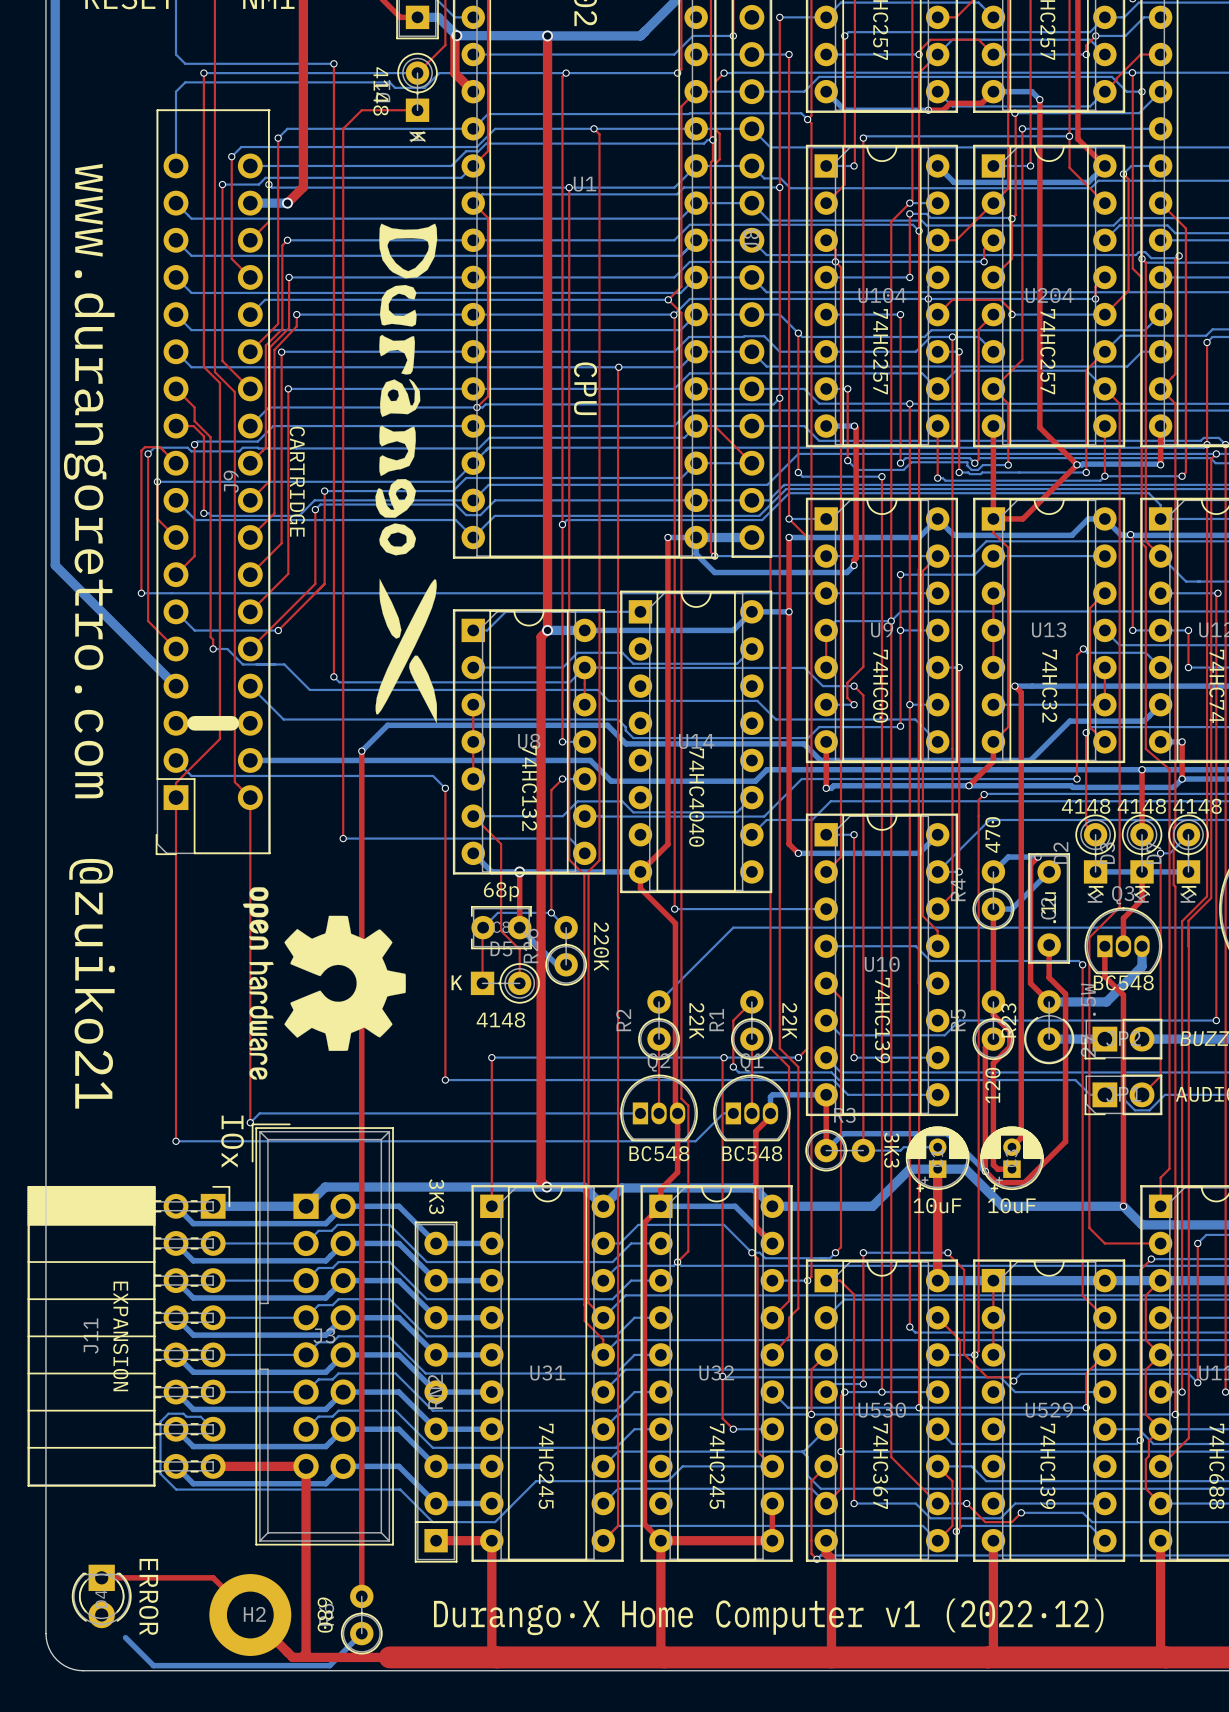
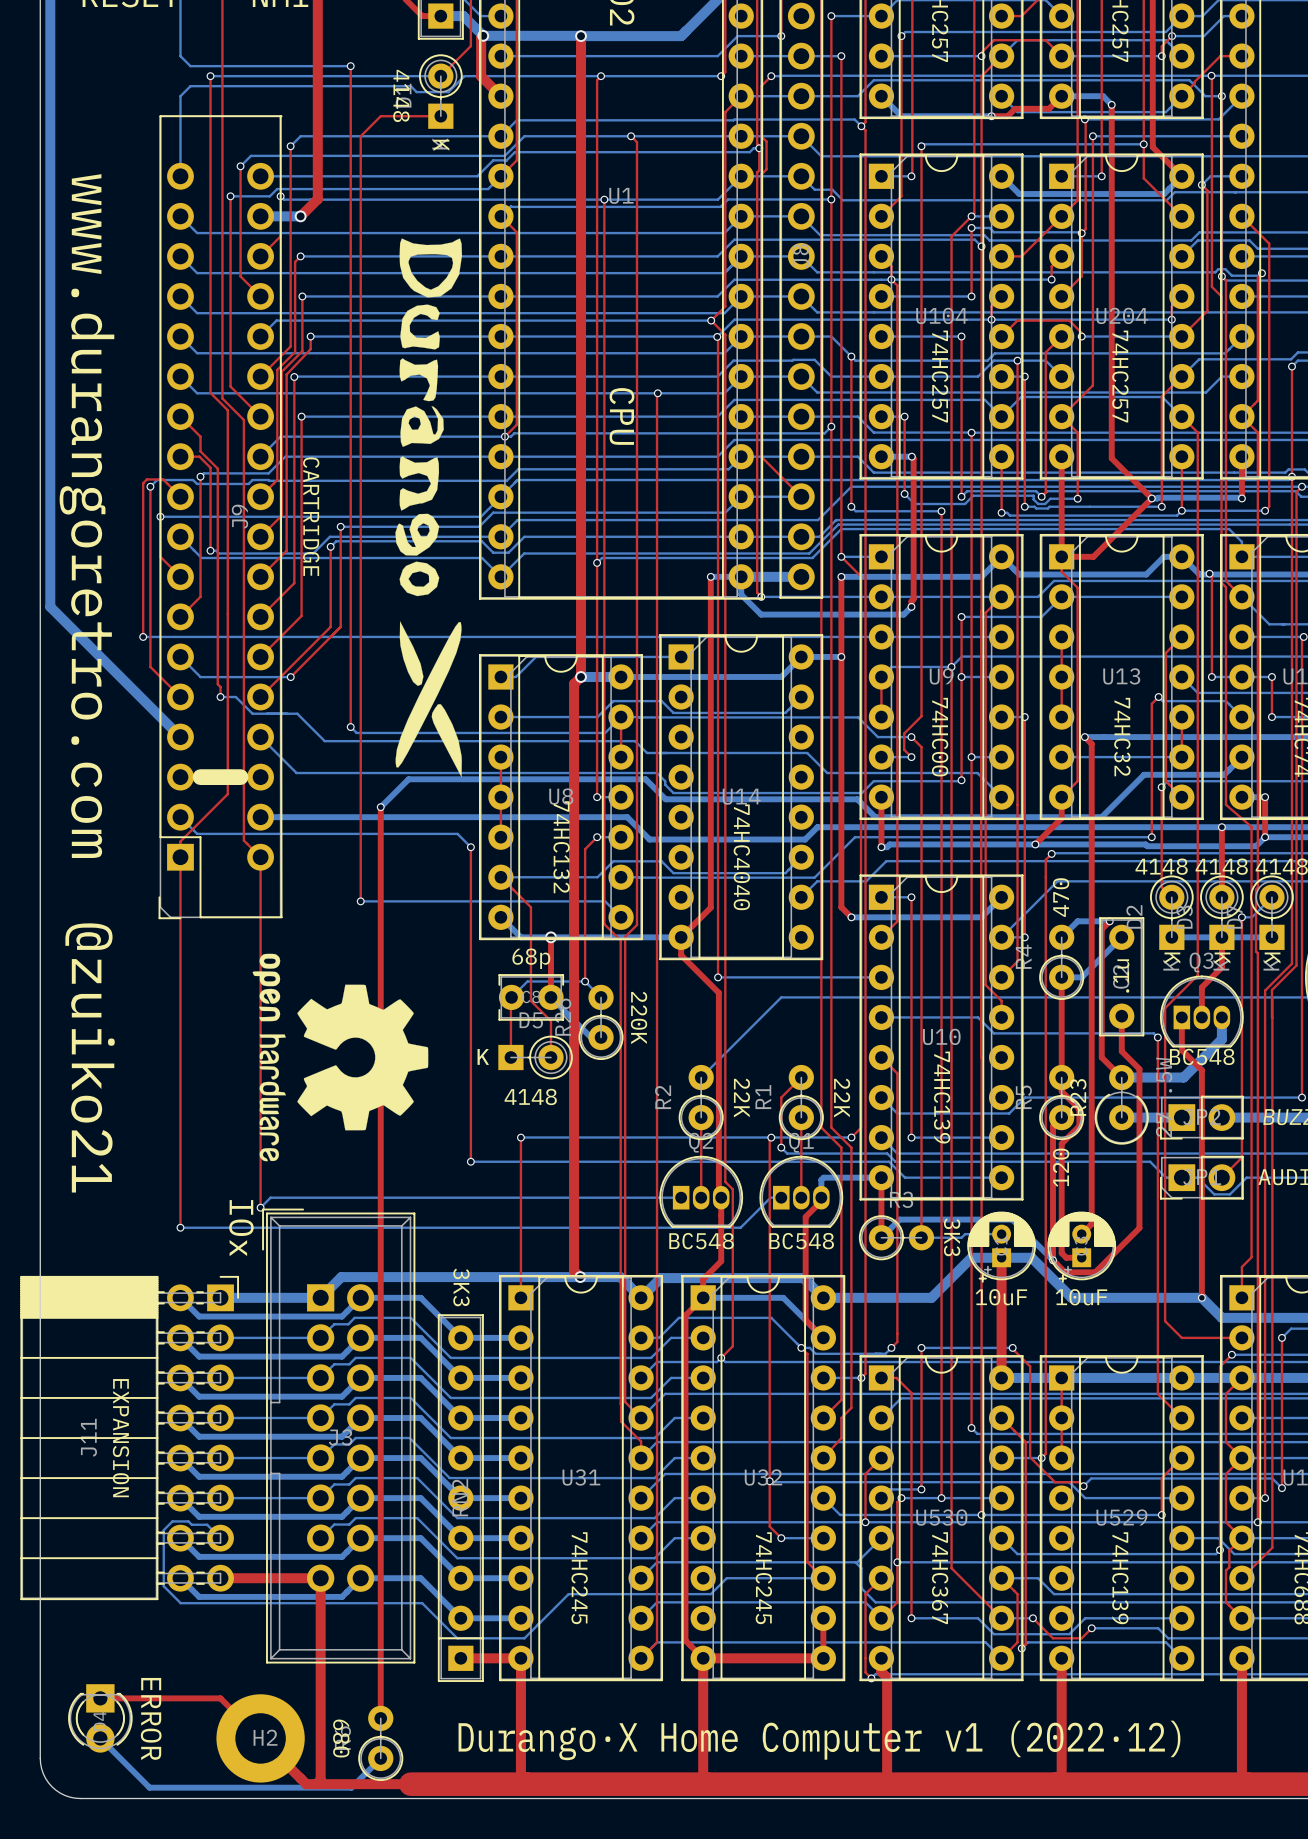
bottom track: (125, 1637) (153, 1665) (329, 1665) (334, 1660) -> (100, 1738) (149, 1787) (351, 1787)

